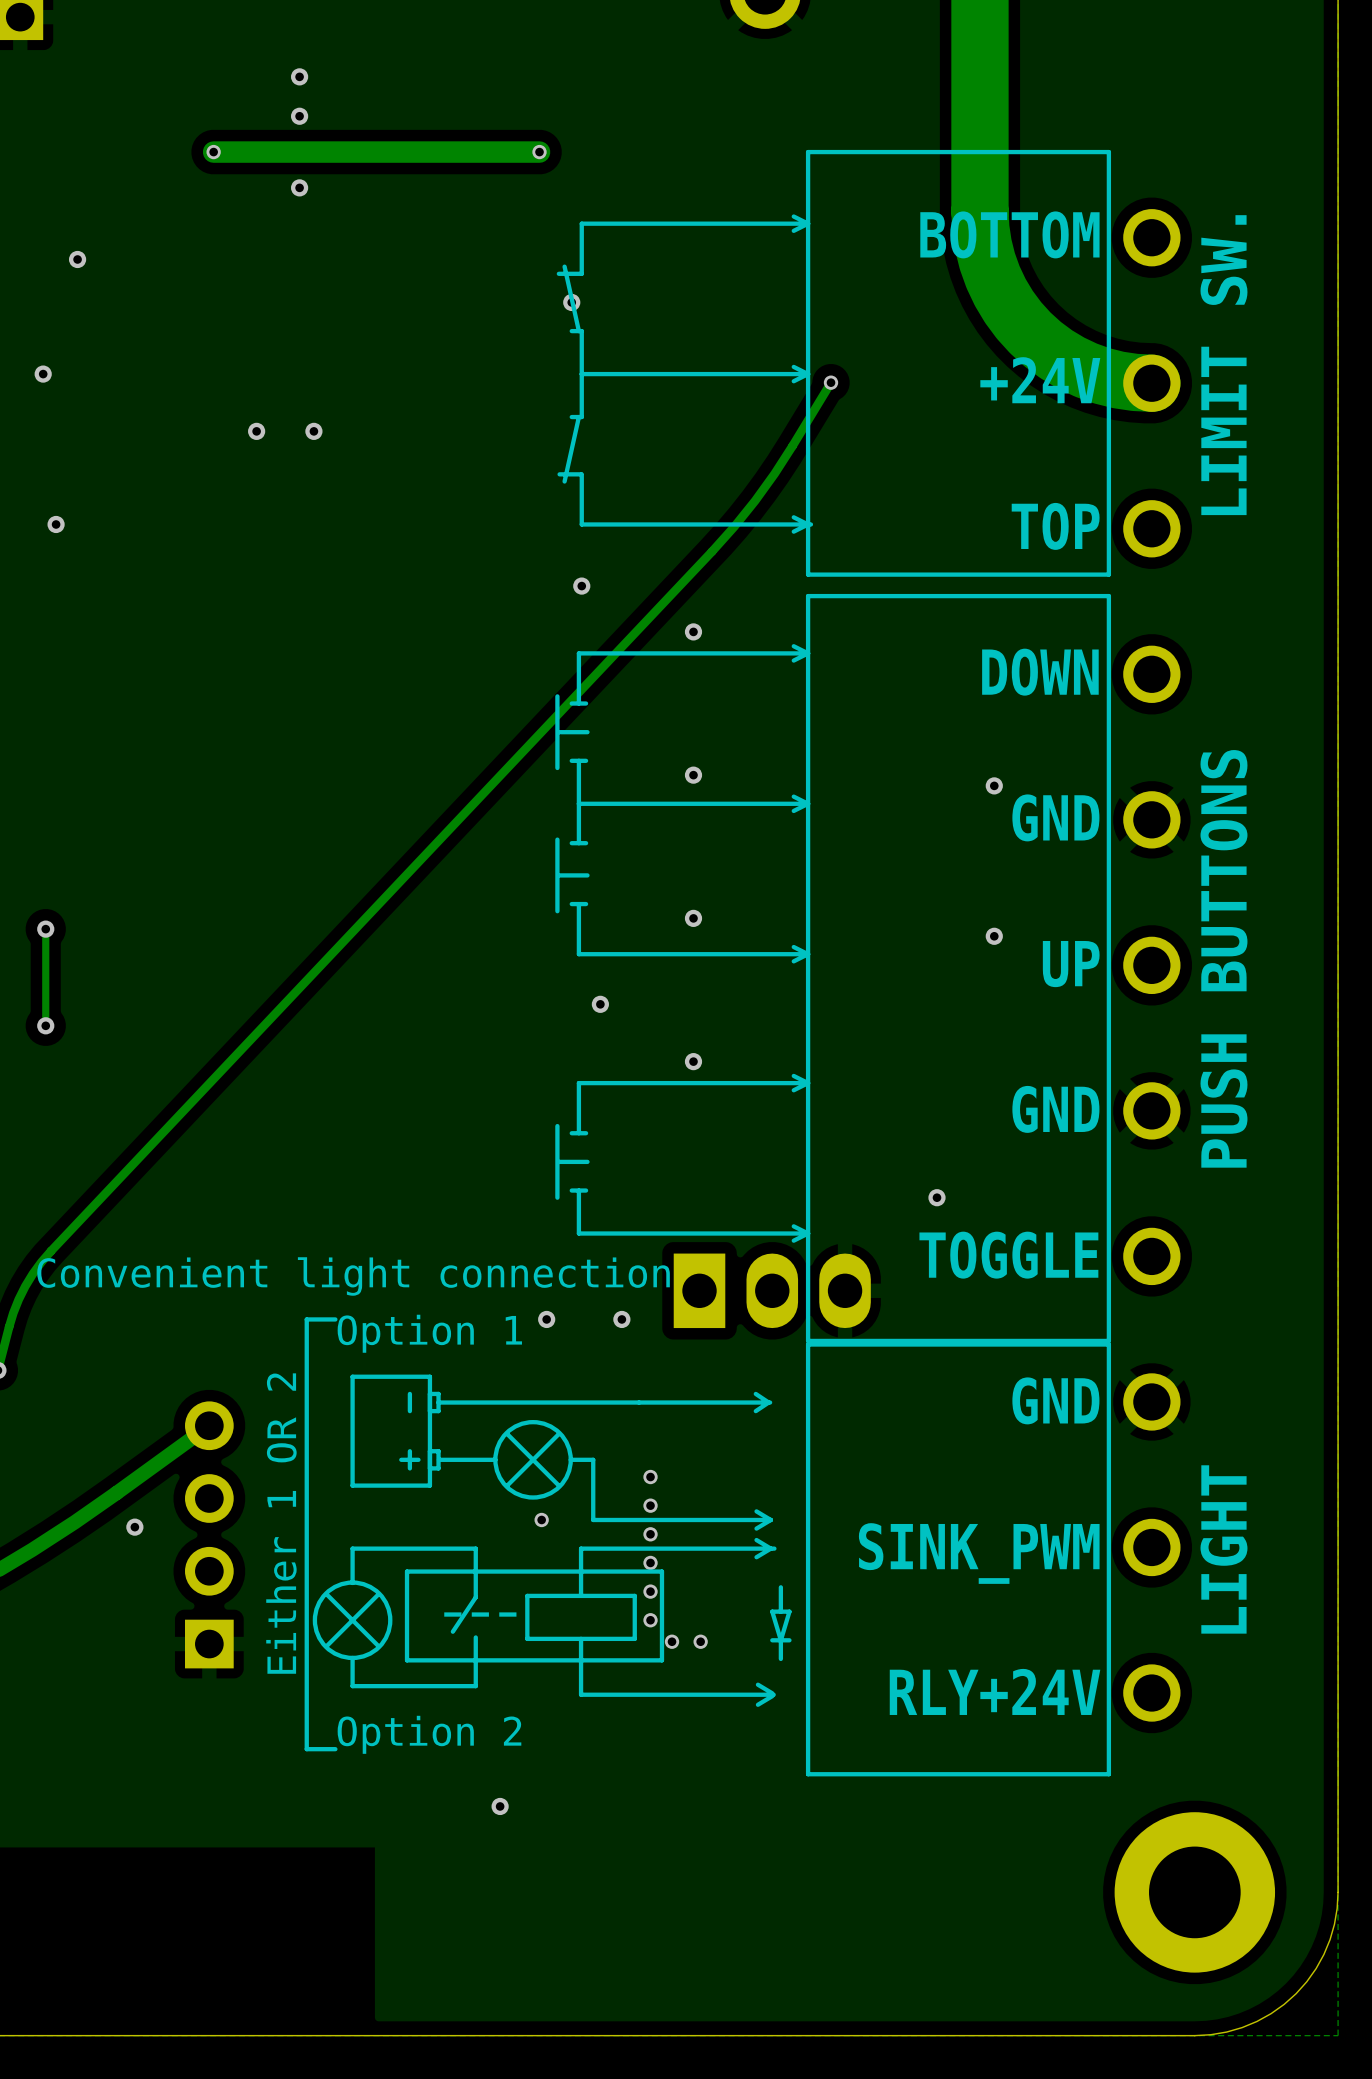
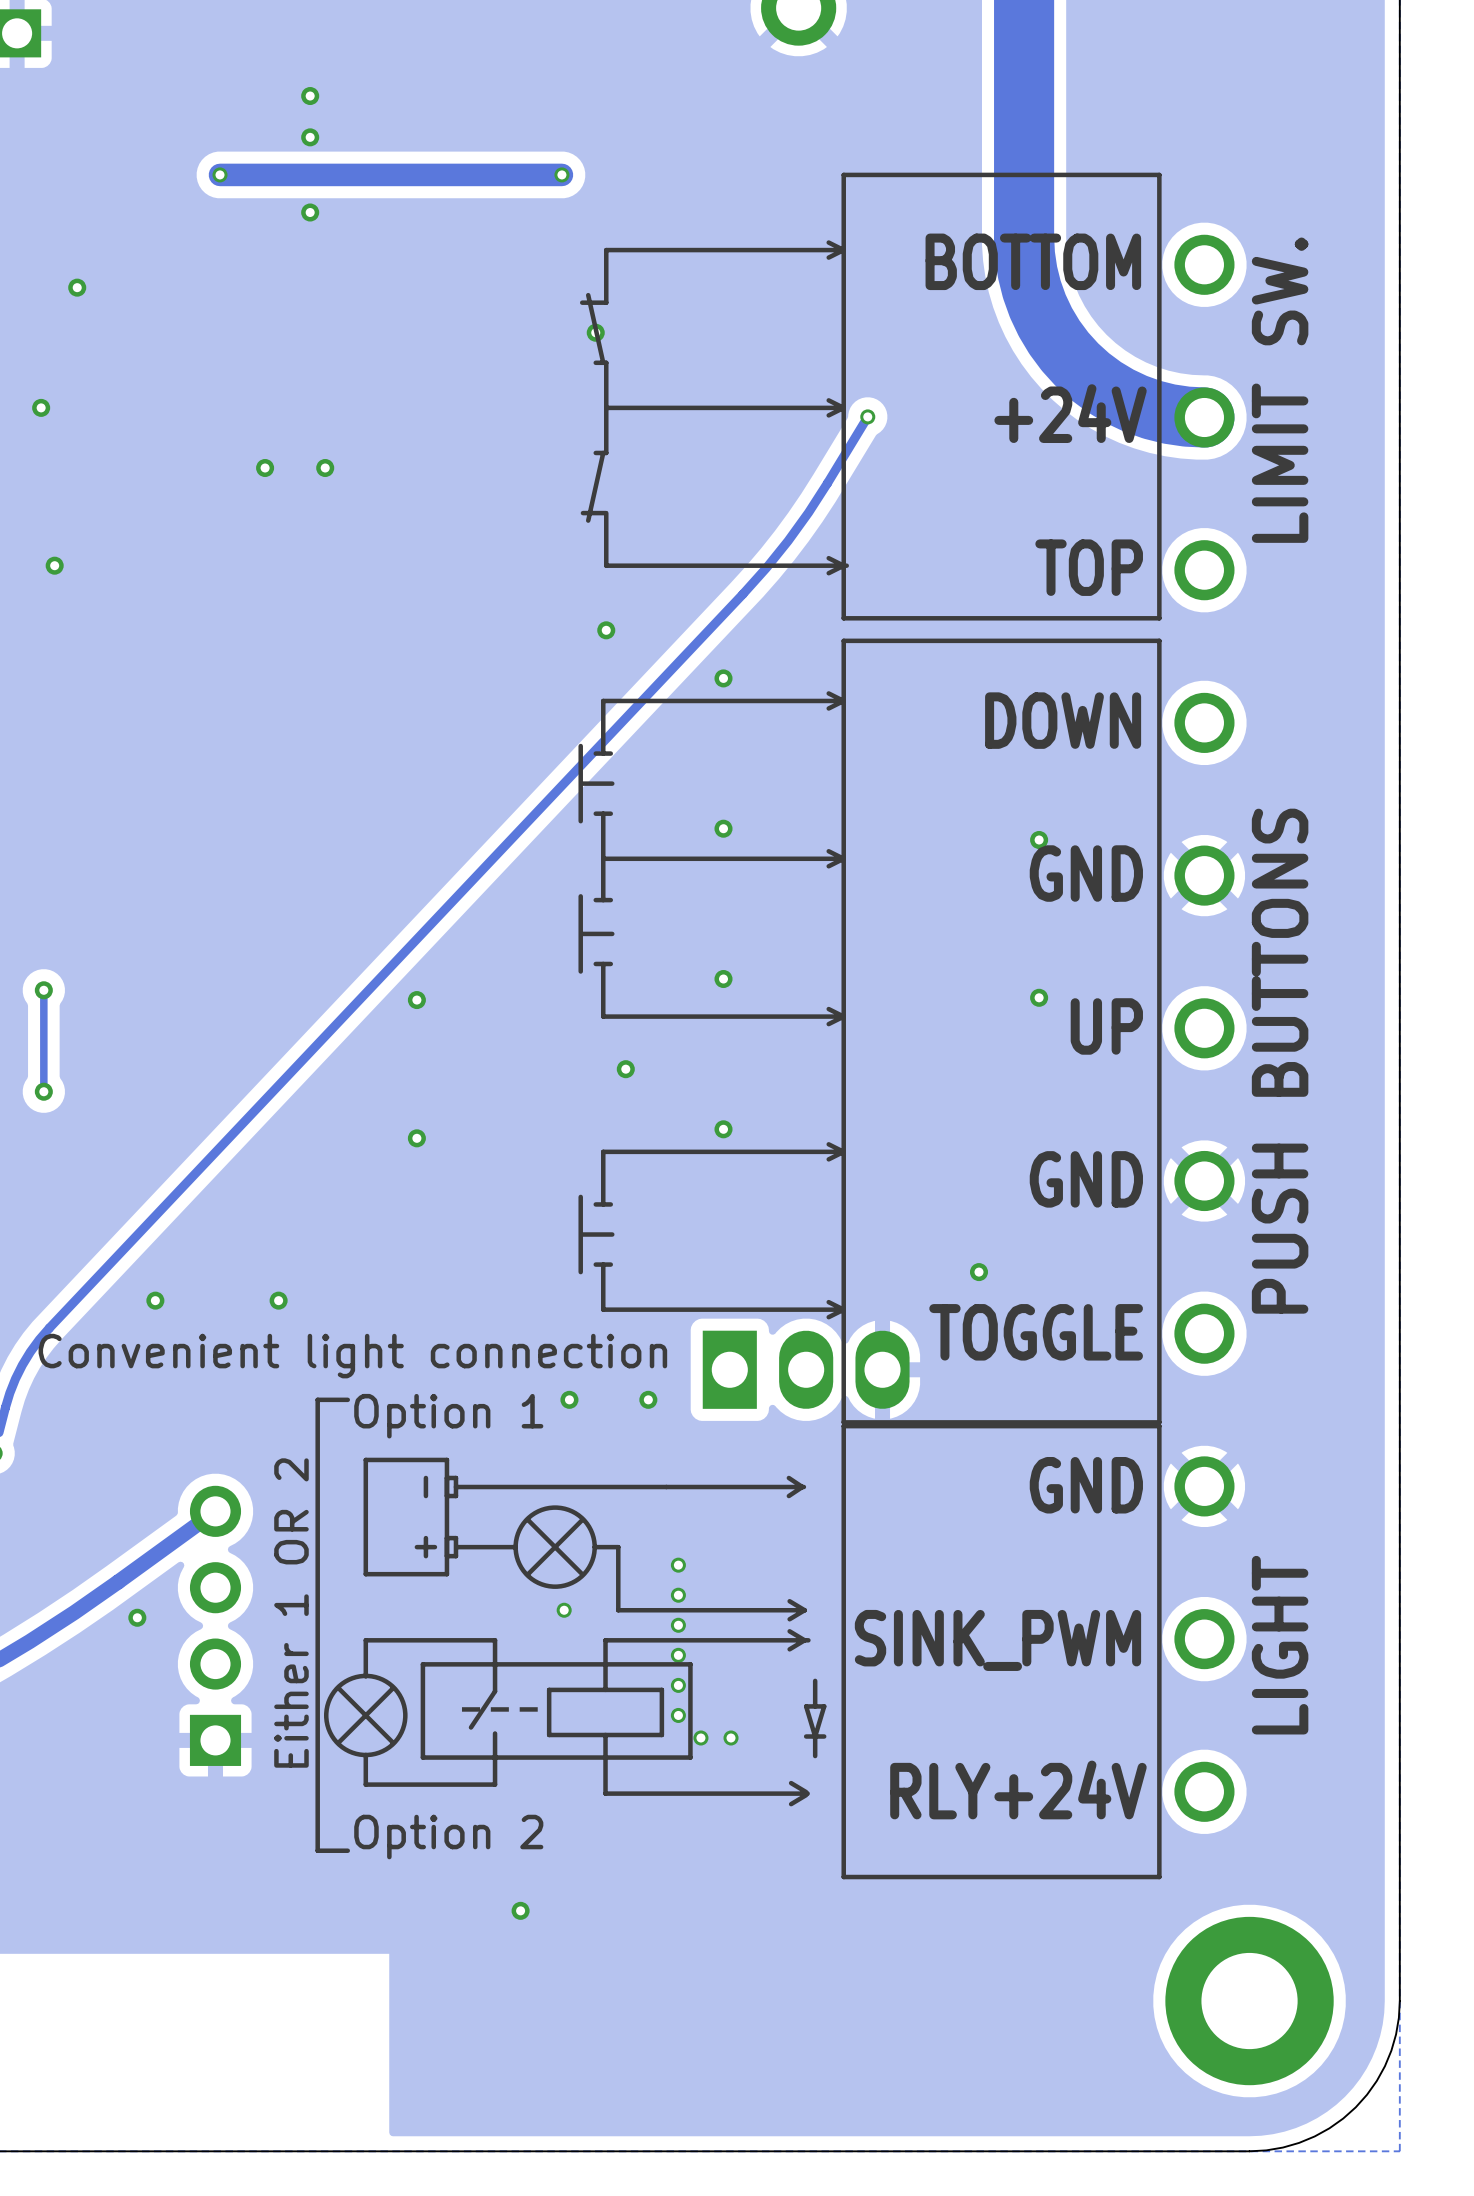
via: none -> (416, 1000)
via: none -> (416, 1138)
via: none -> (155, 1300)
via: none -> (278, 1300)

